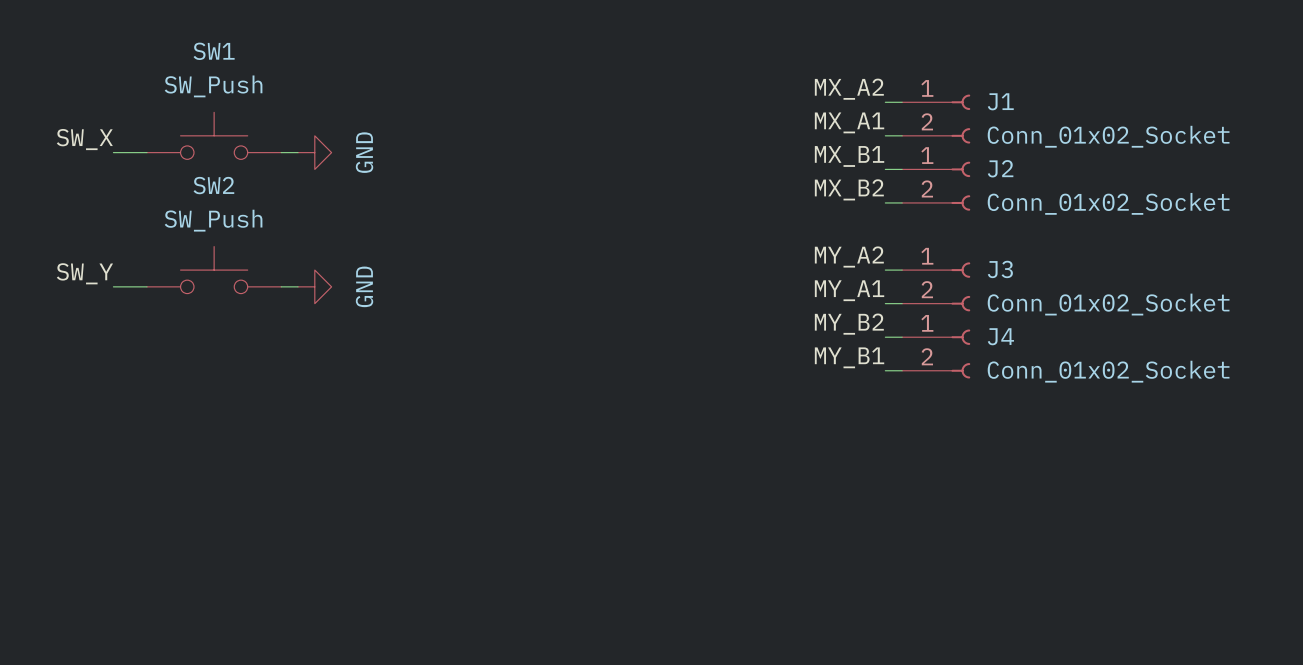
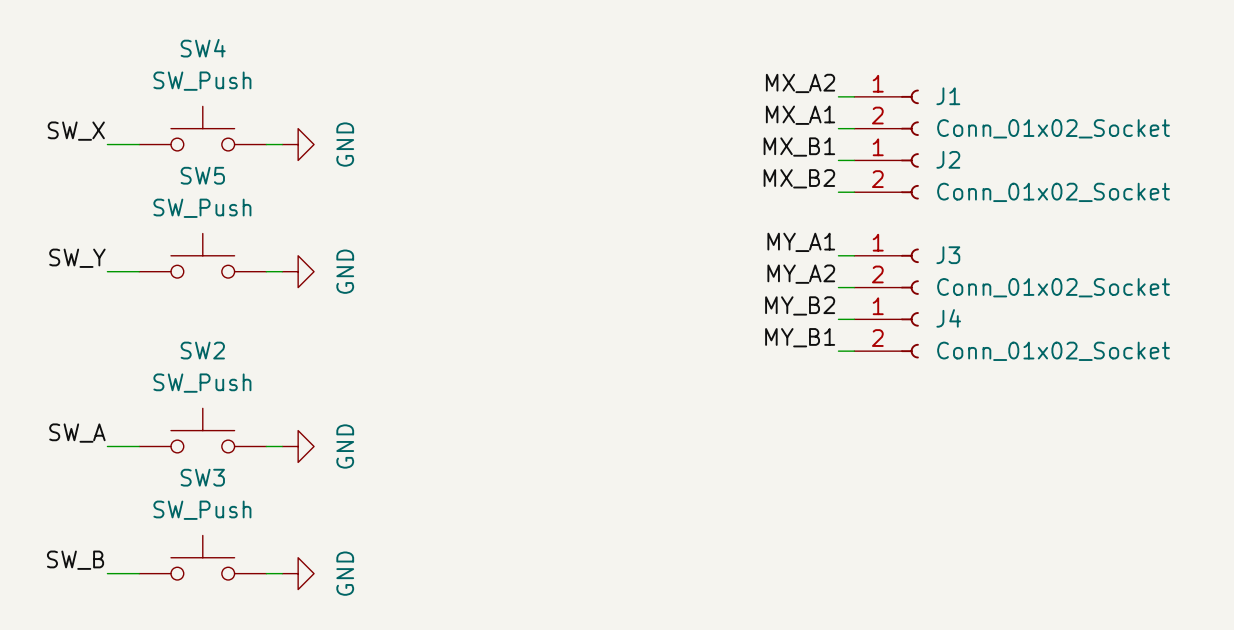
SW1 name: SW1 (214, 51) -> SW4 (203, 48)
SW2 name: SW2 (213, 185) -> SW5 (202, 175)
label: MY_A2 (849, 257) -> MY_A1 (801, 242)
label: MY_A1 (849, 290) -> MY_A2 (801, 274)
SW2: none -> SW_Push (202, 430)
label: none -> SW_A (77, 433)
wire: none -> (107, 446) (139, 446)
wire: none -> (266, 446) (282, 446)
power symbol: none -> GND (298, 446)
SW3: none -> SW_Push (202, 557)
label: none -> SW_B (75, 560)
wire: none -> (107, 573) (139, 573)
wire: none -> (266, 573) (282, 573)
power symbol: none -> GND (298, 573)

